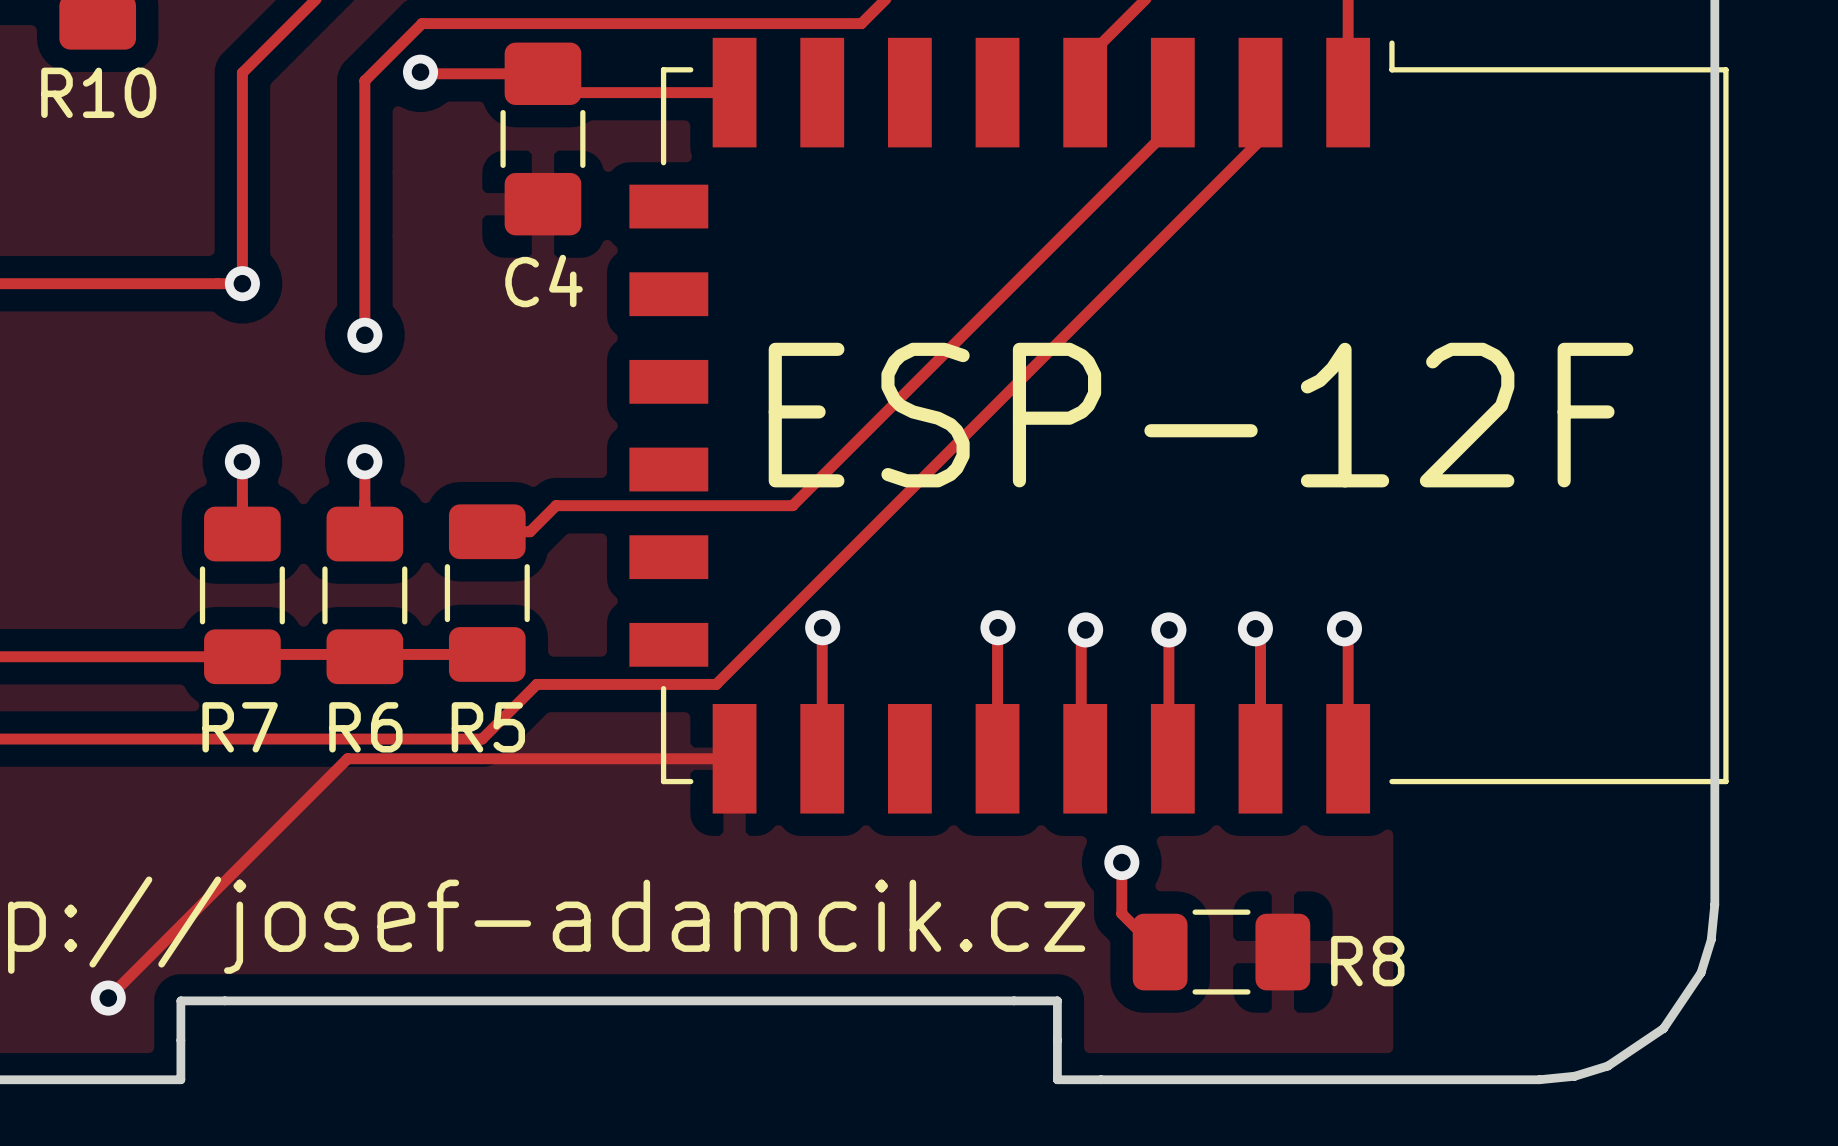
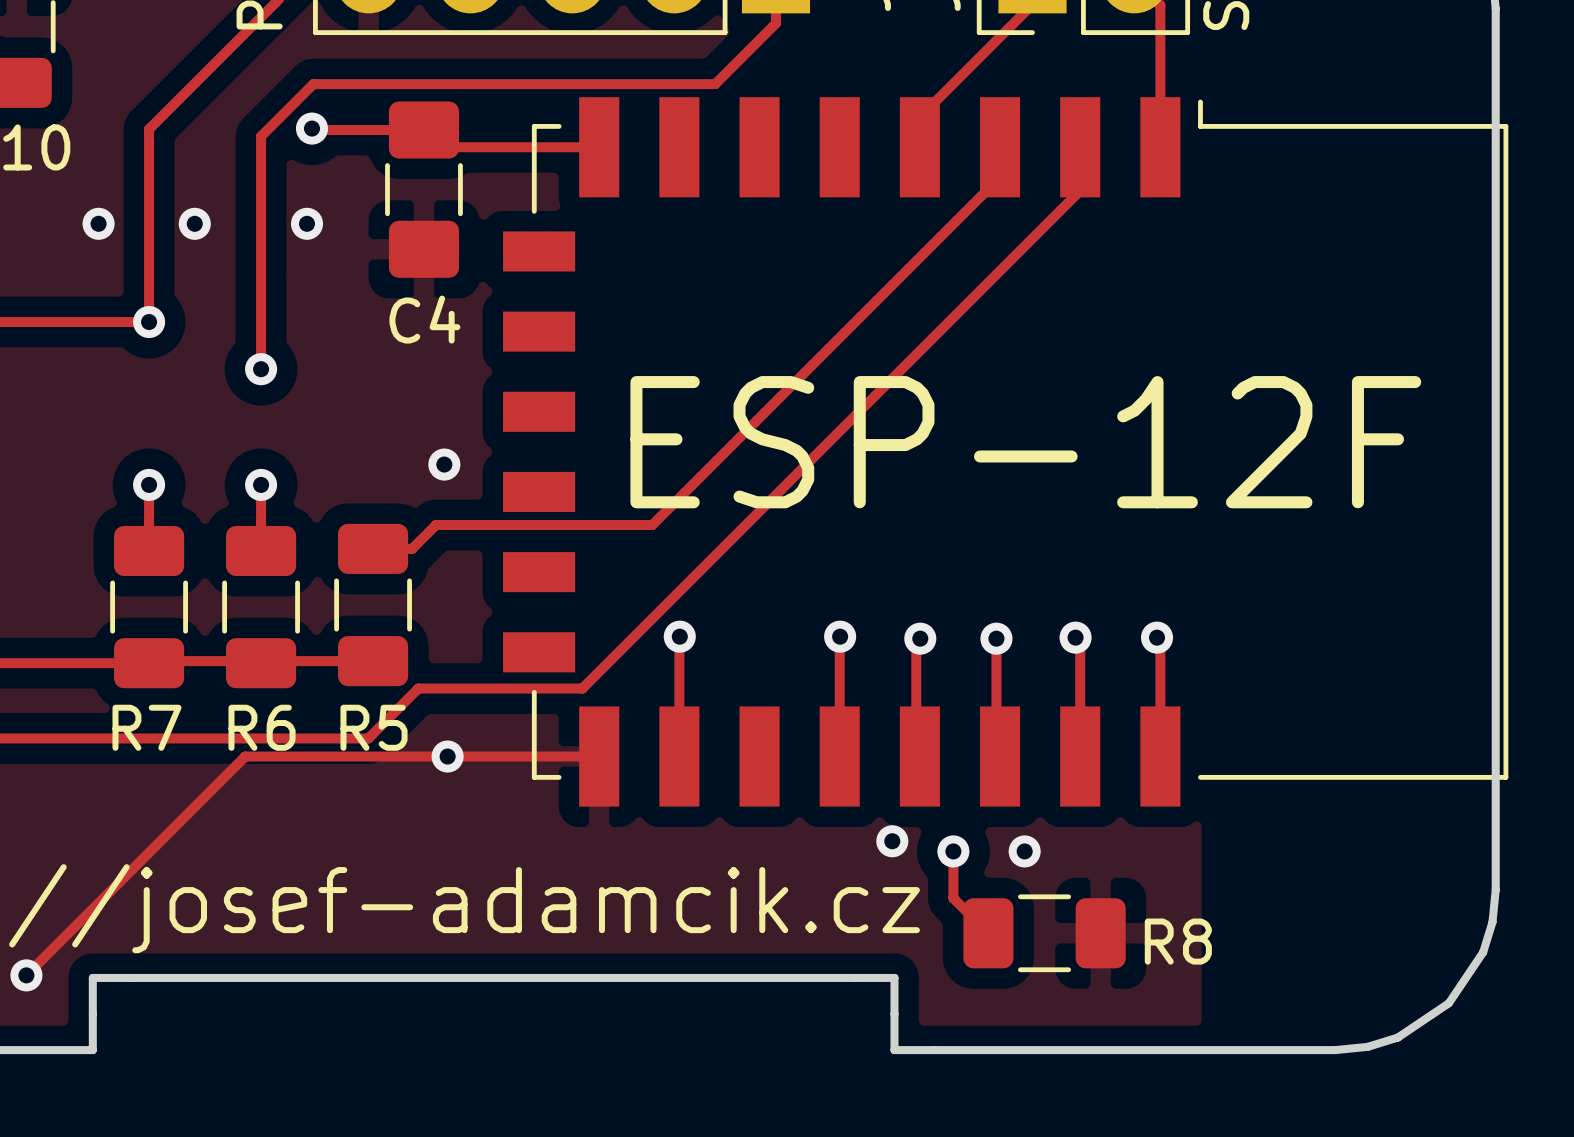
via: none -> (98, 223)
via: none -> (194, 223)
via: none -> (307, 223)
via: none -> (444, 464)
via: none -> (447, 756)
via: none -> (892, 841)
via: none -> (1024, 851)

